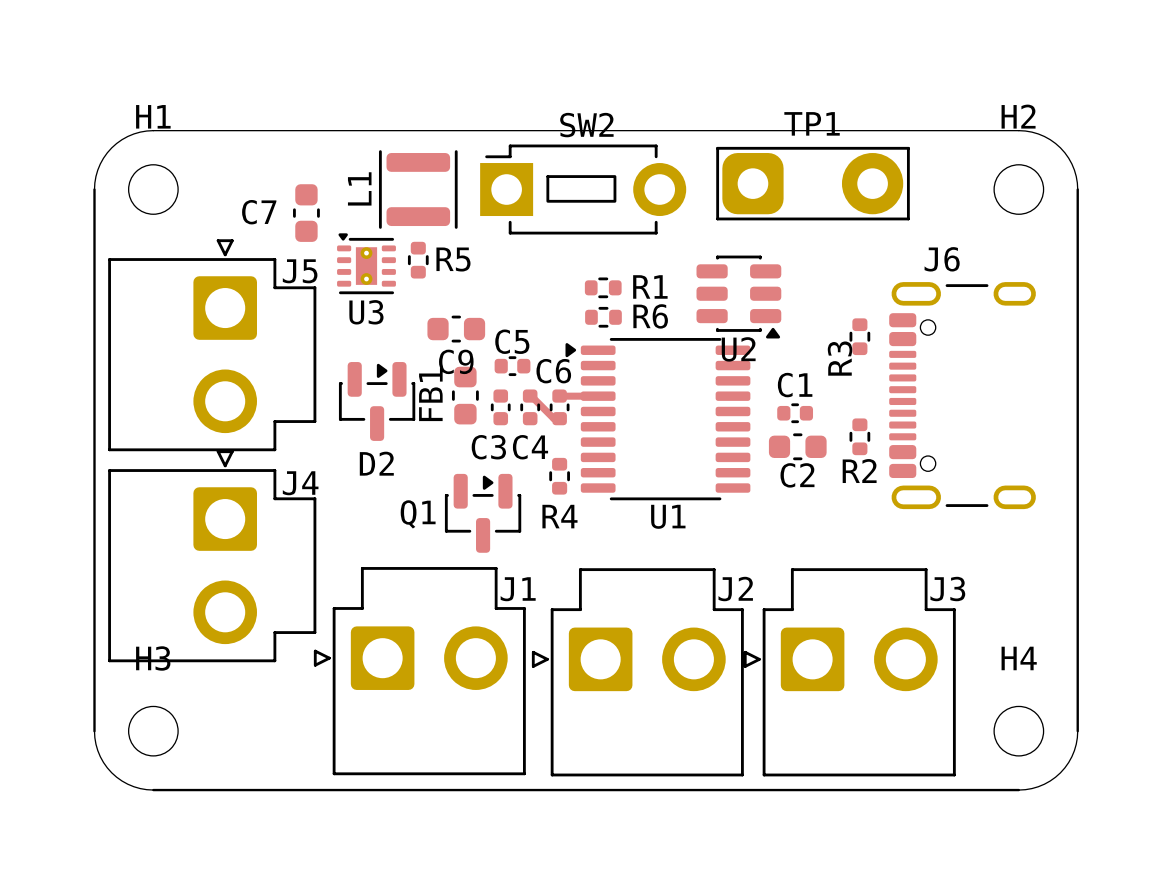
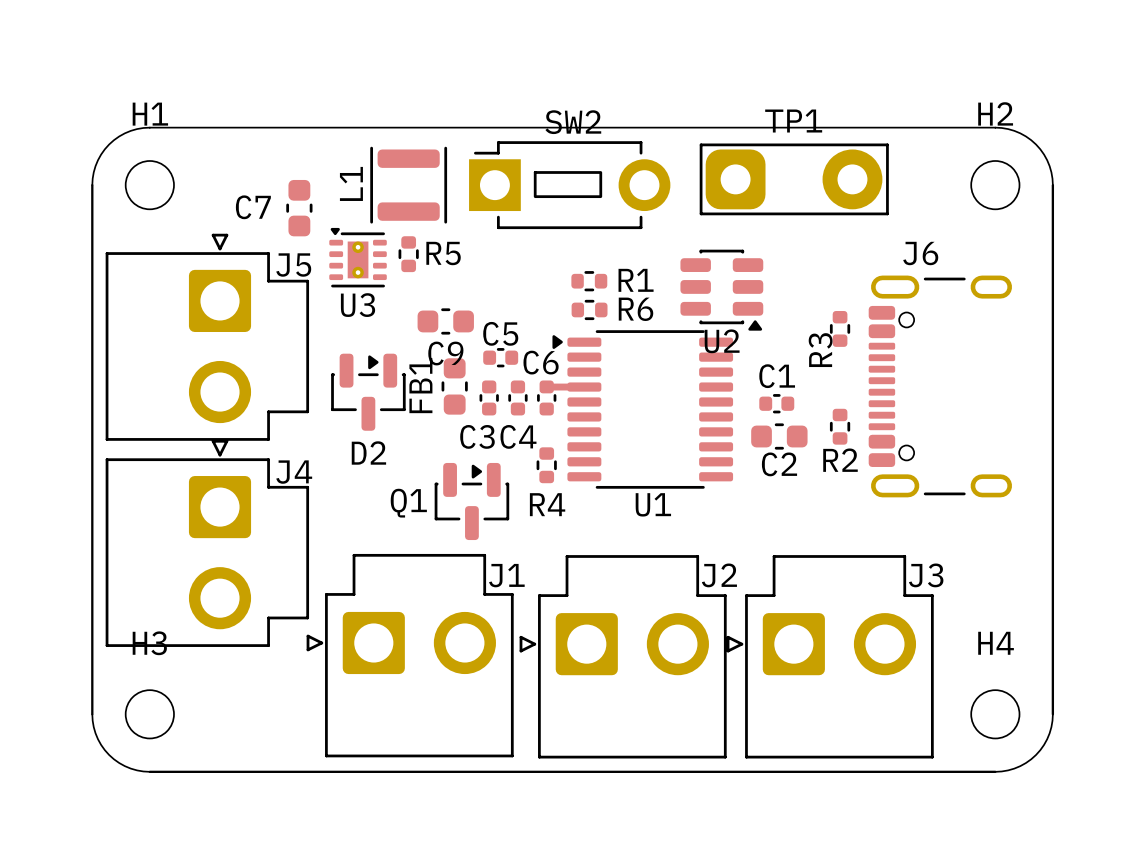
track: (530, 396) (553, 418) (559, 418) -> none

